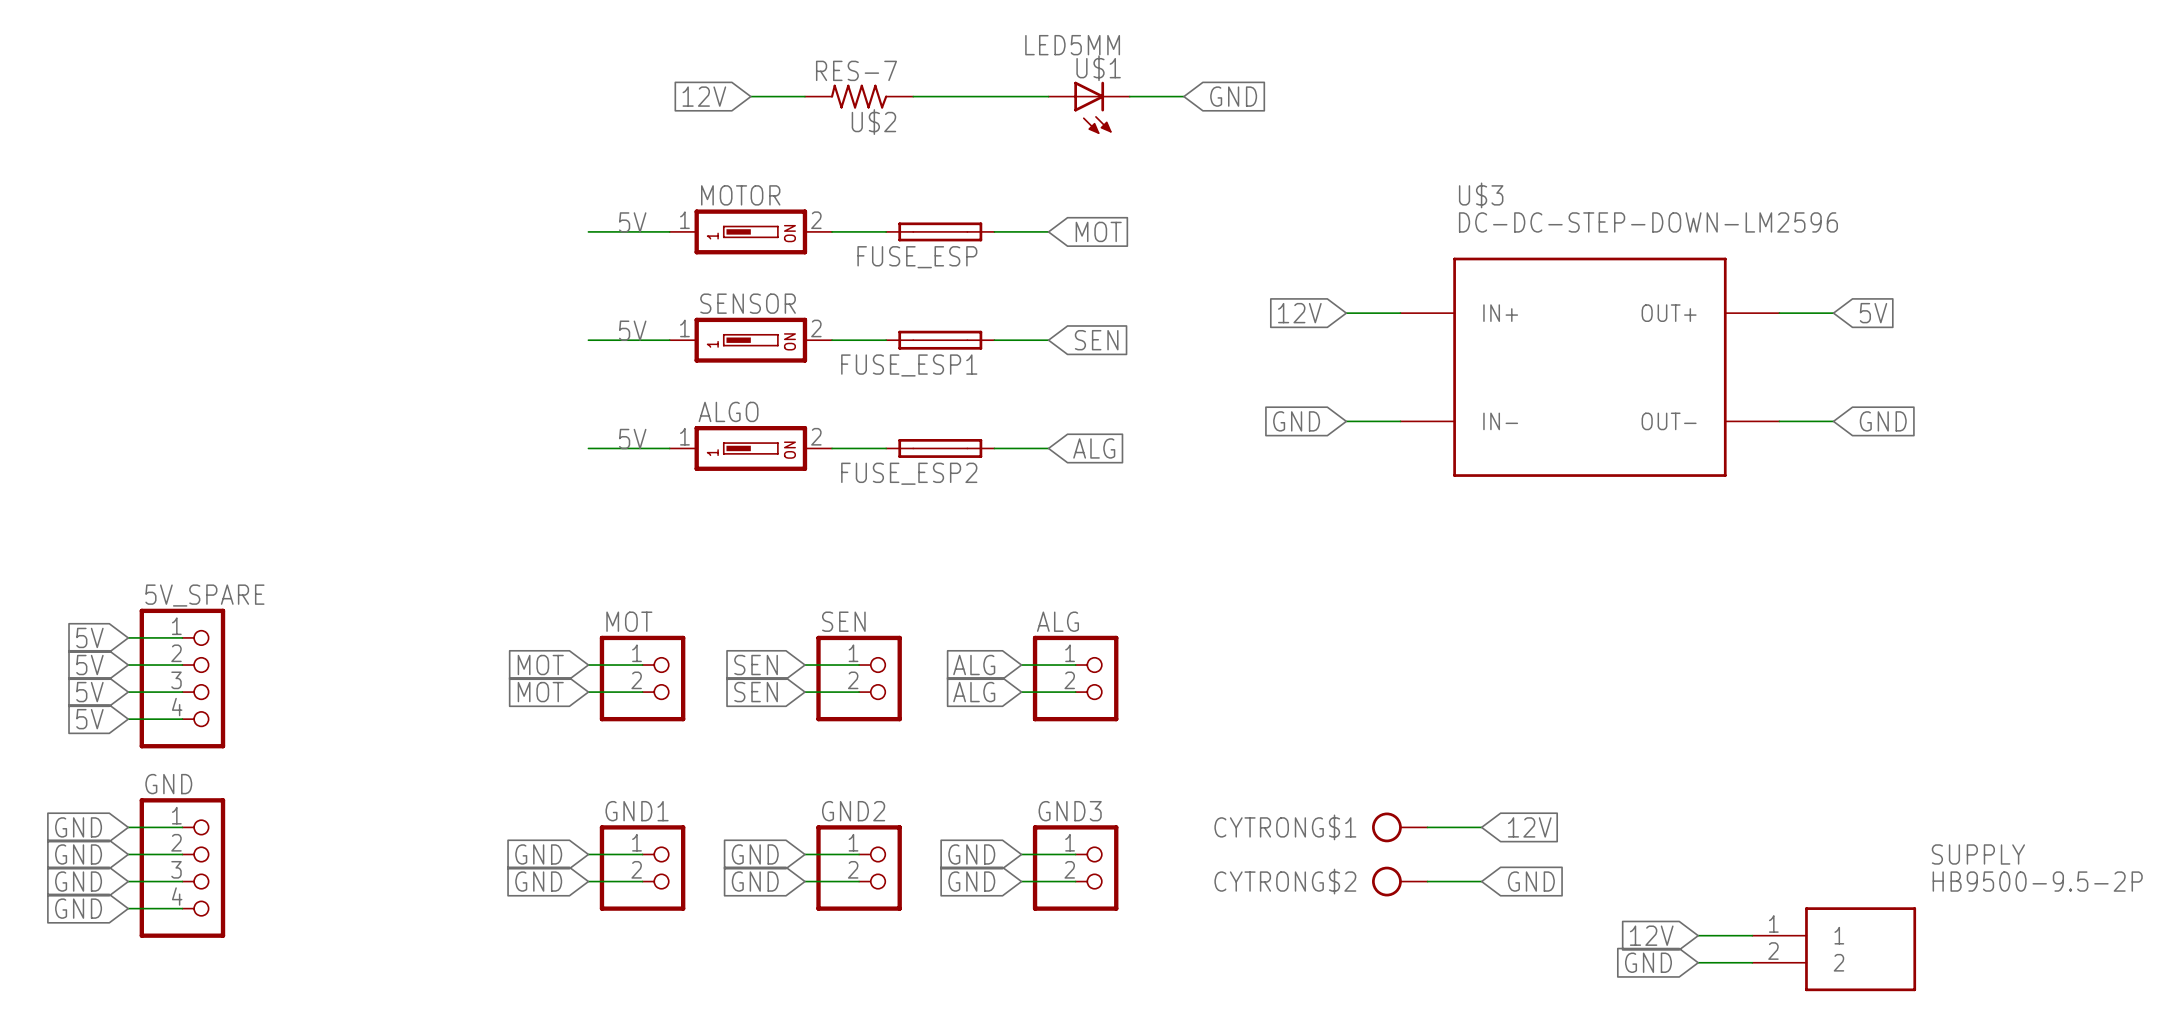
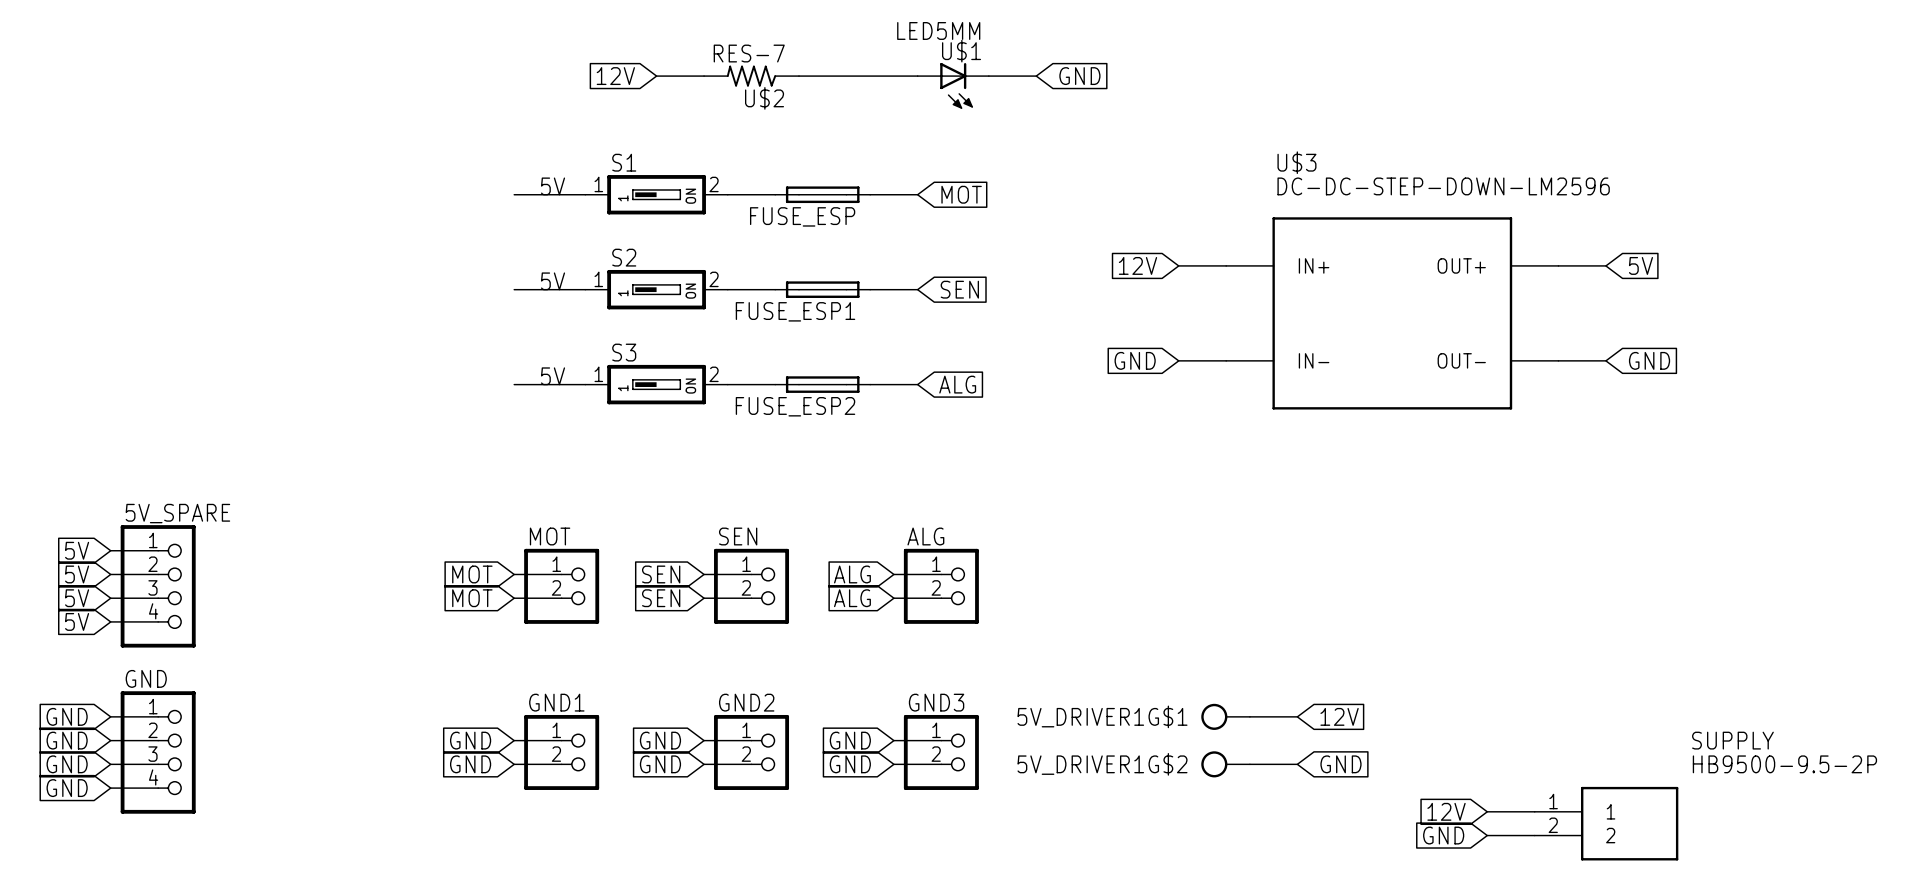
MOTOR name: MOTOR (740, 195) -> S1 (624, 162)
SENSOR name: SENSOR (748, 303) -> S2 (624, 257)
ALGO name: ALGO (728, 411) -> S3 (624, 352)
CYTRONG$1 name: CYTRONG$1 (1285, 827) -> 5V_DRIVER1G$1 (1102, 716)
CYTRONG$2 name: CYTRONG$2 (1285, 881) -> 5V_DRIVER1G$2 (1102, 764)

